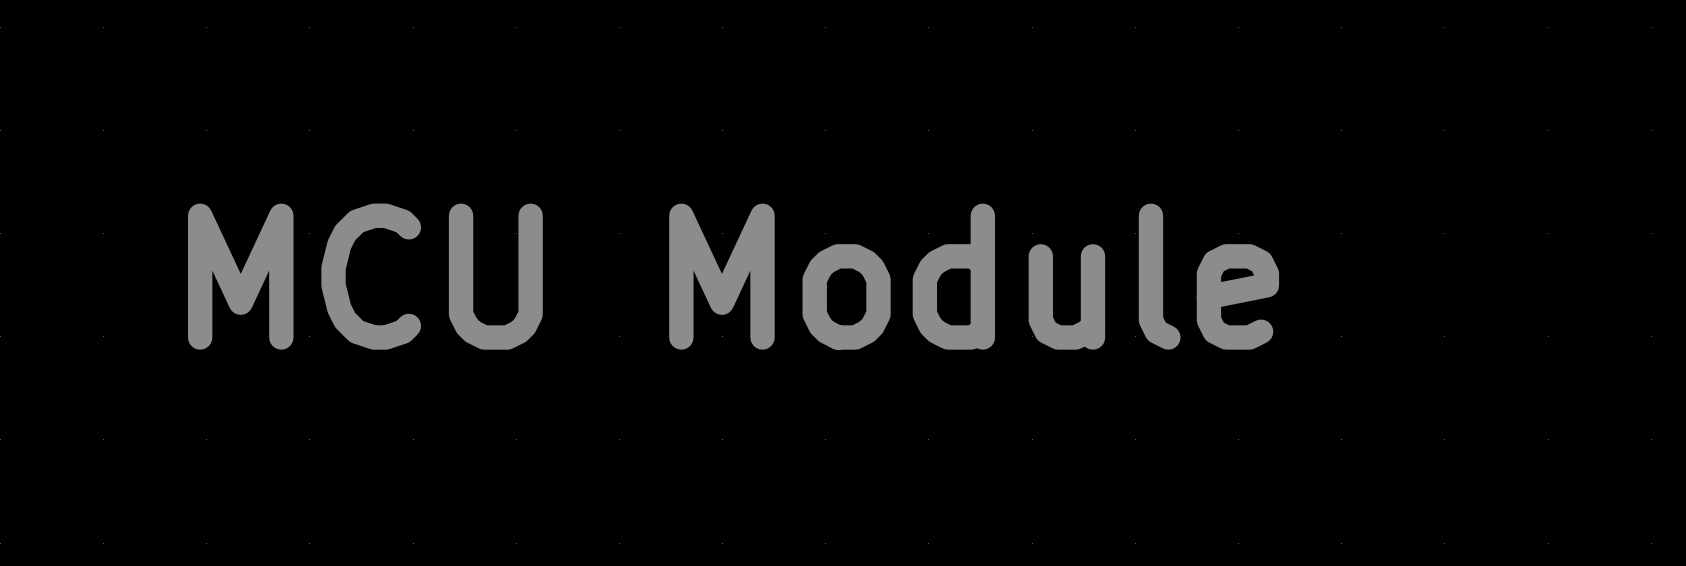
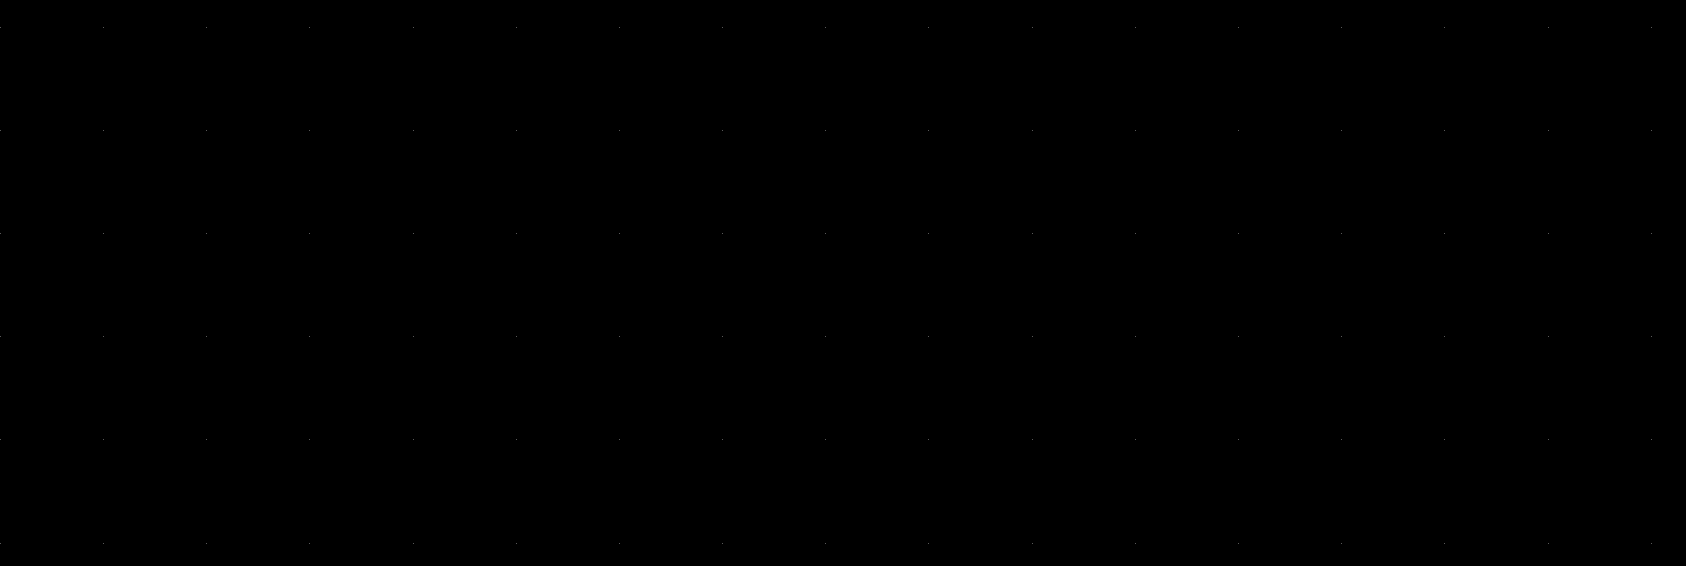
text: MCU Module (733, 276) -> none

